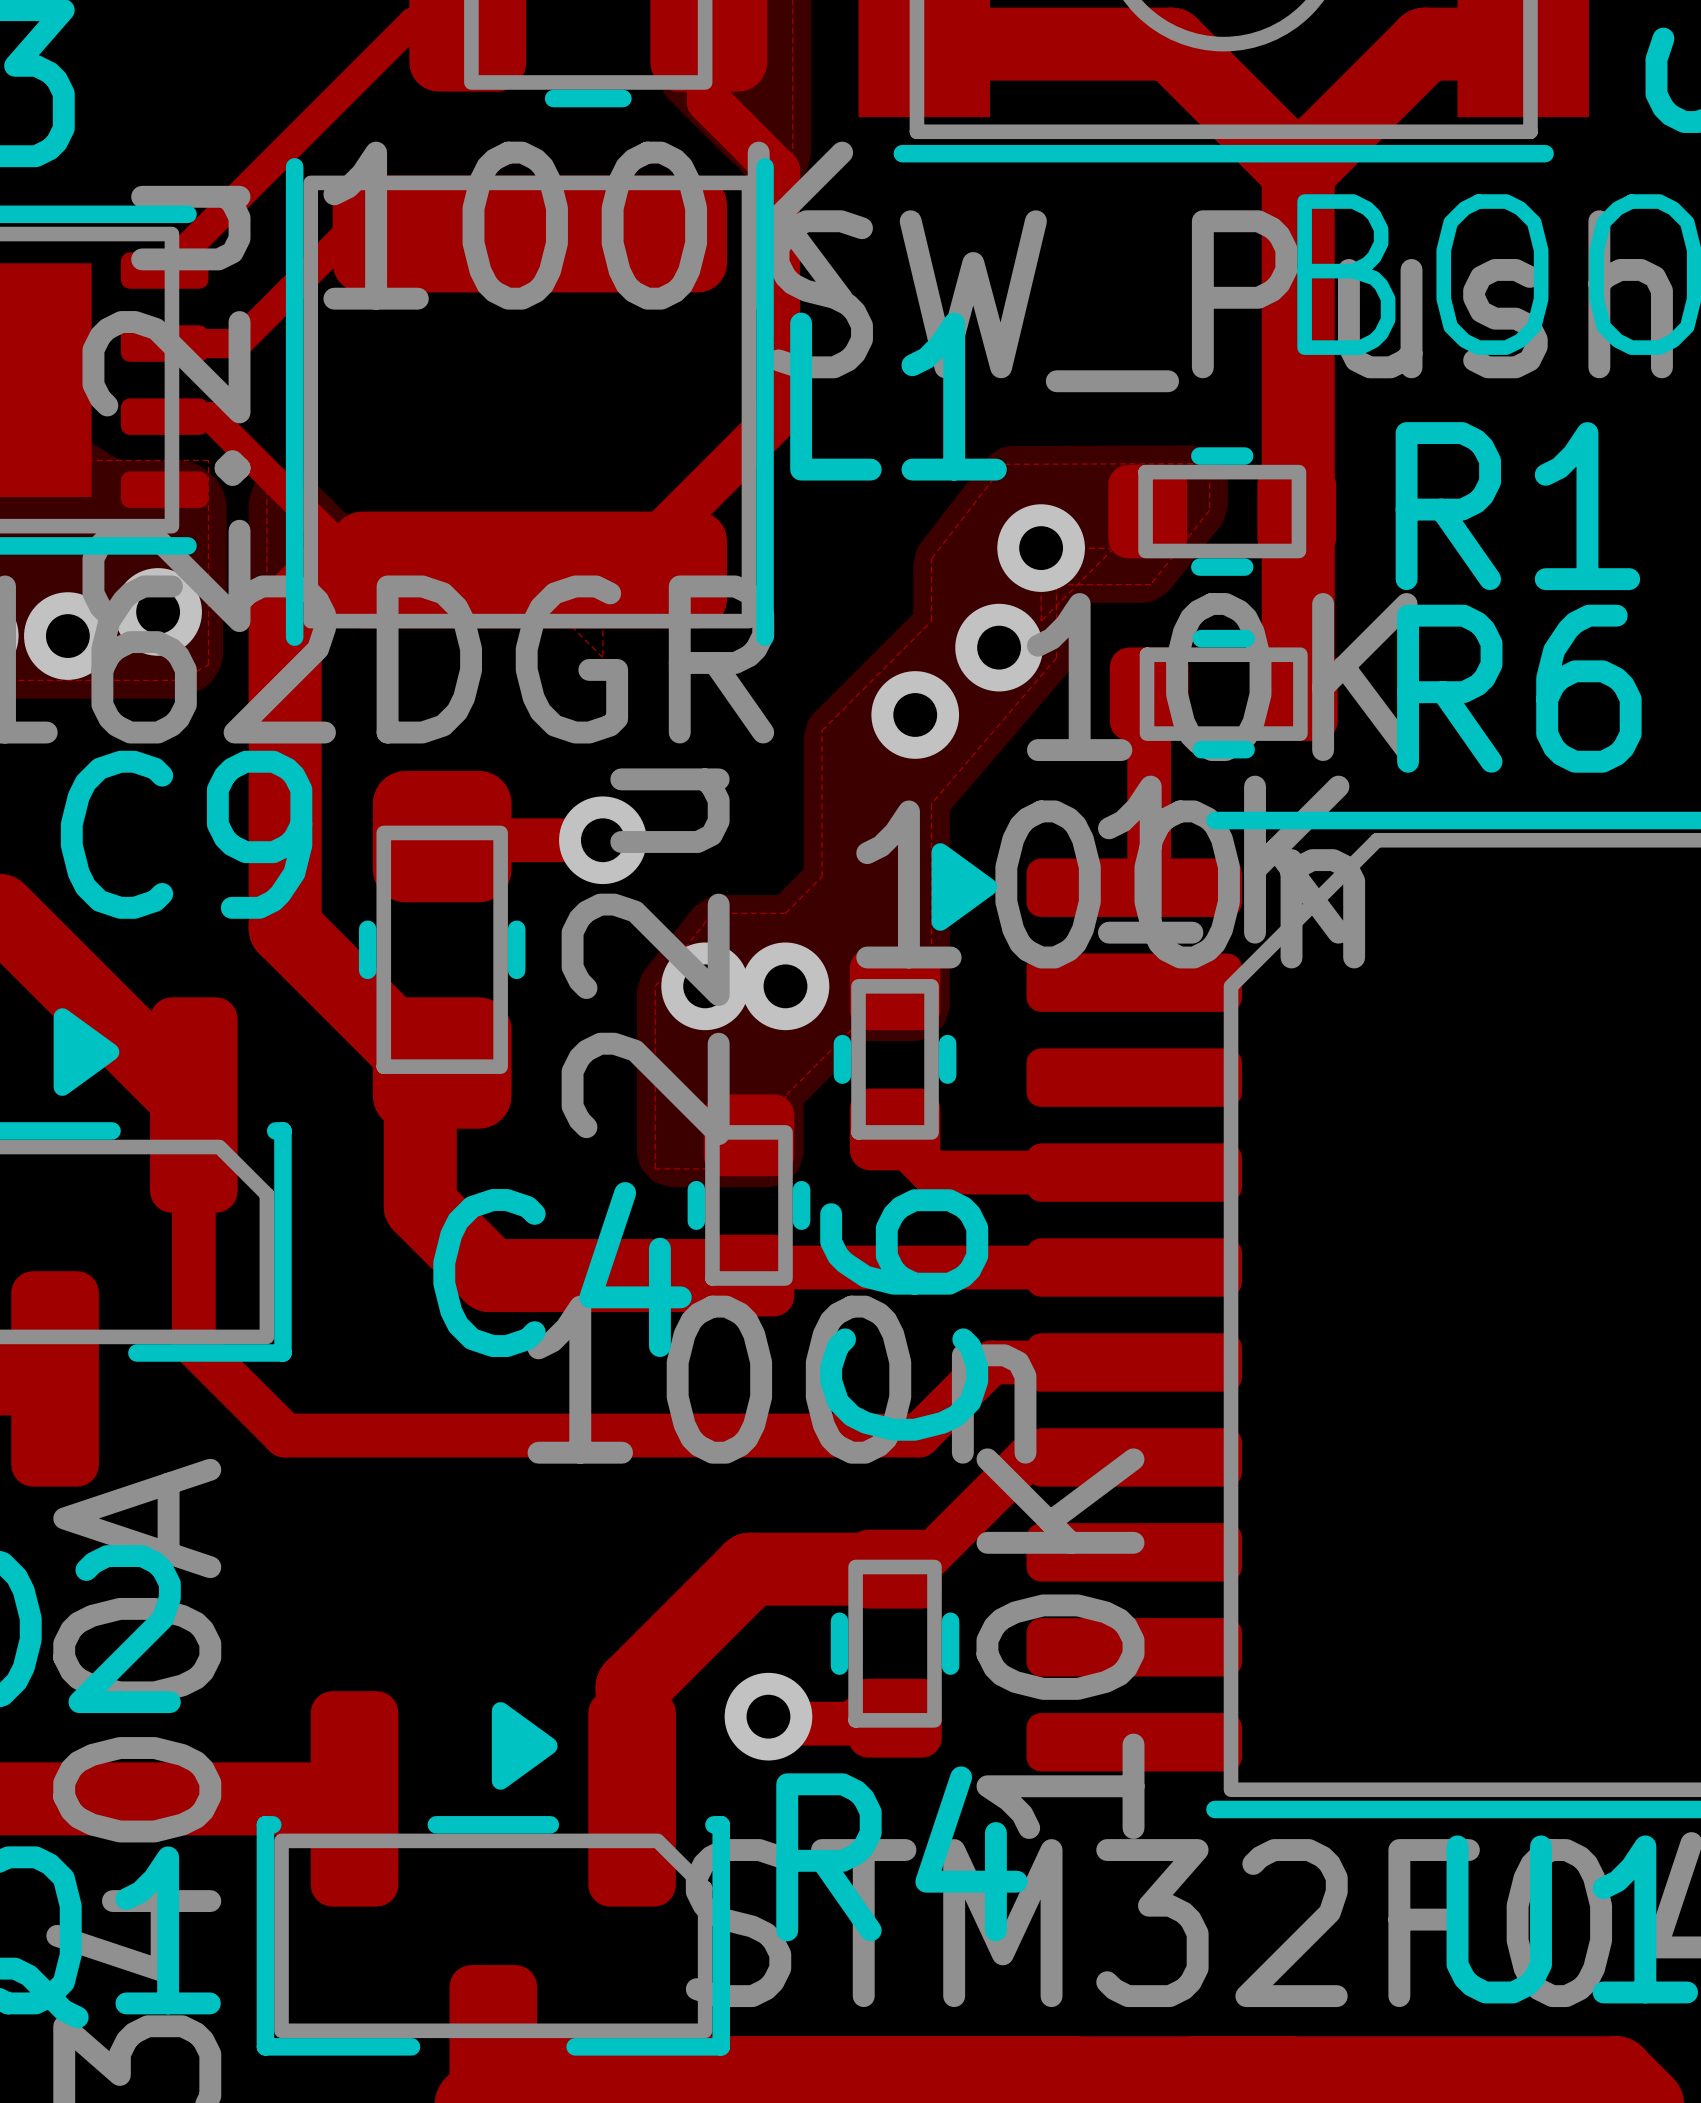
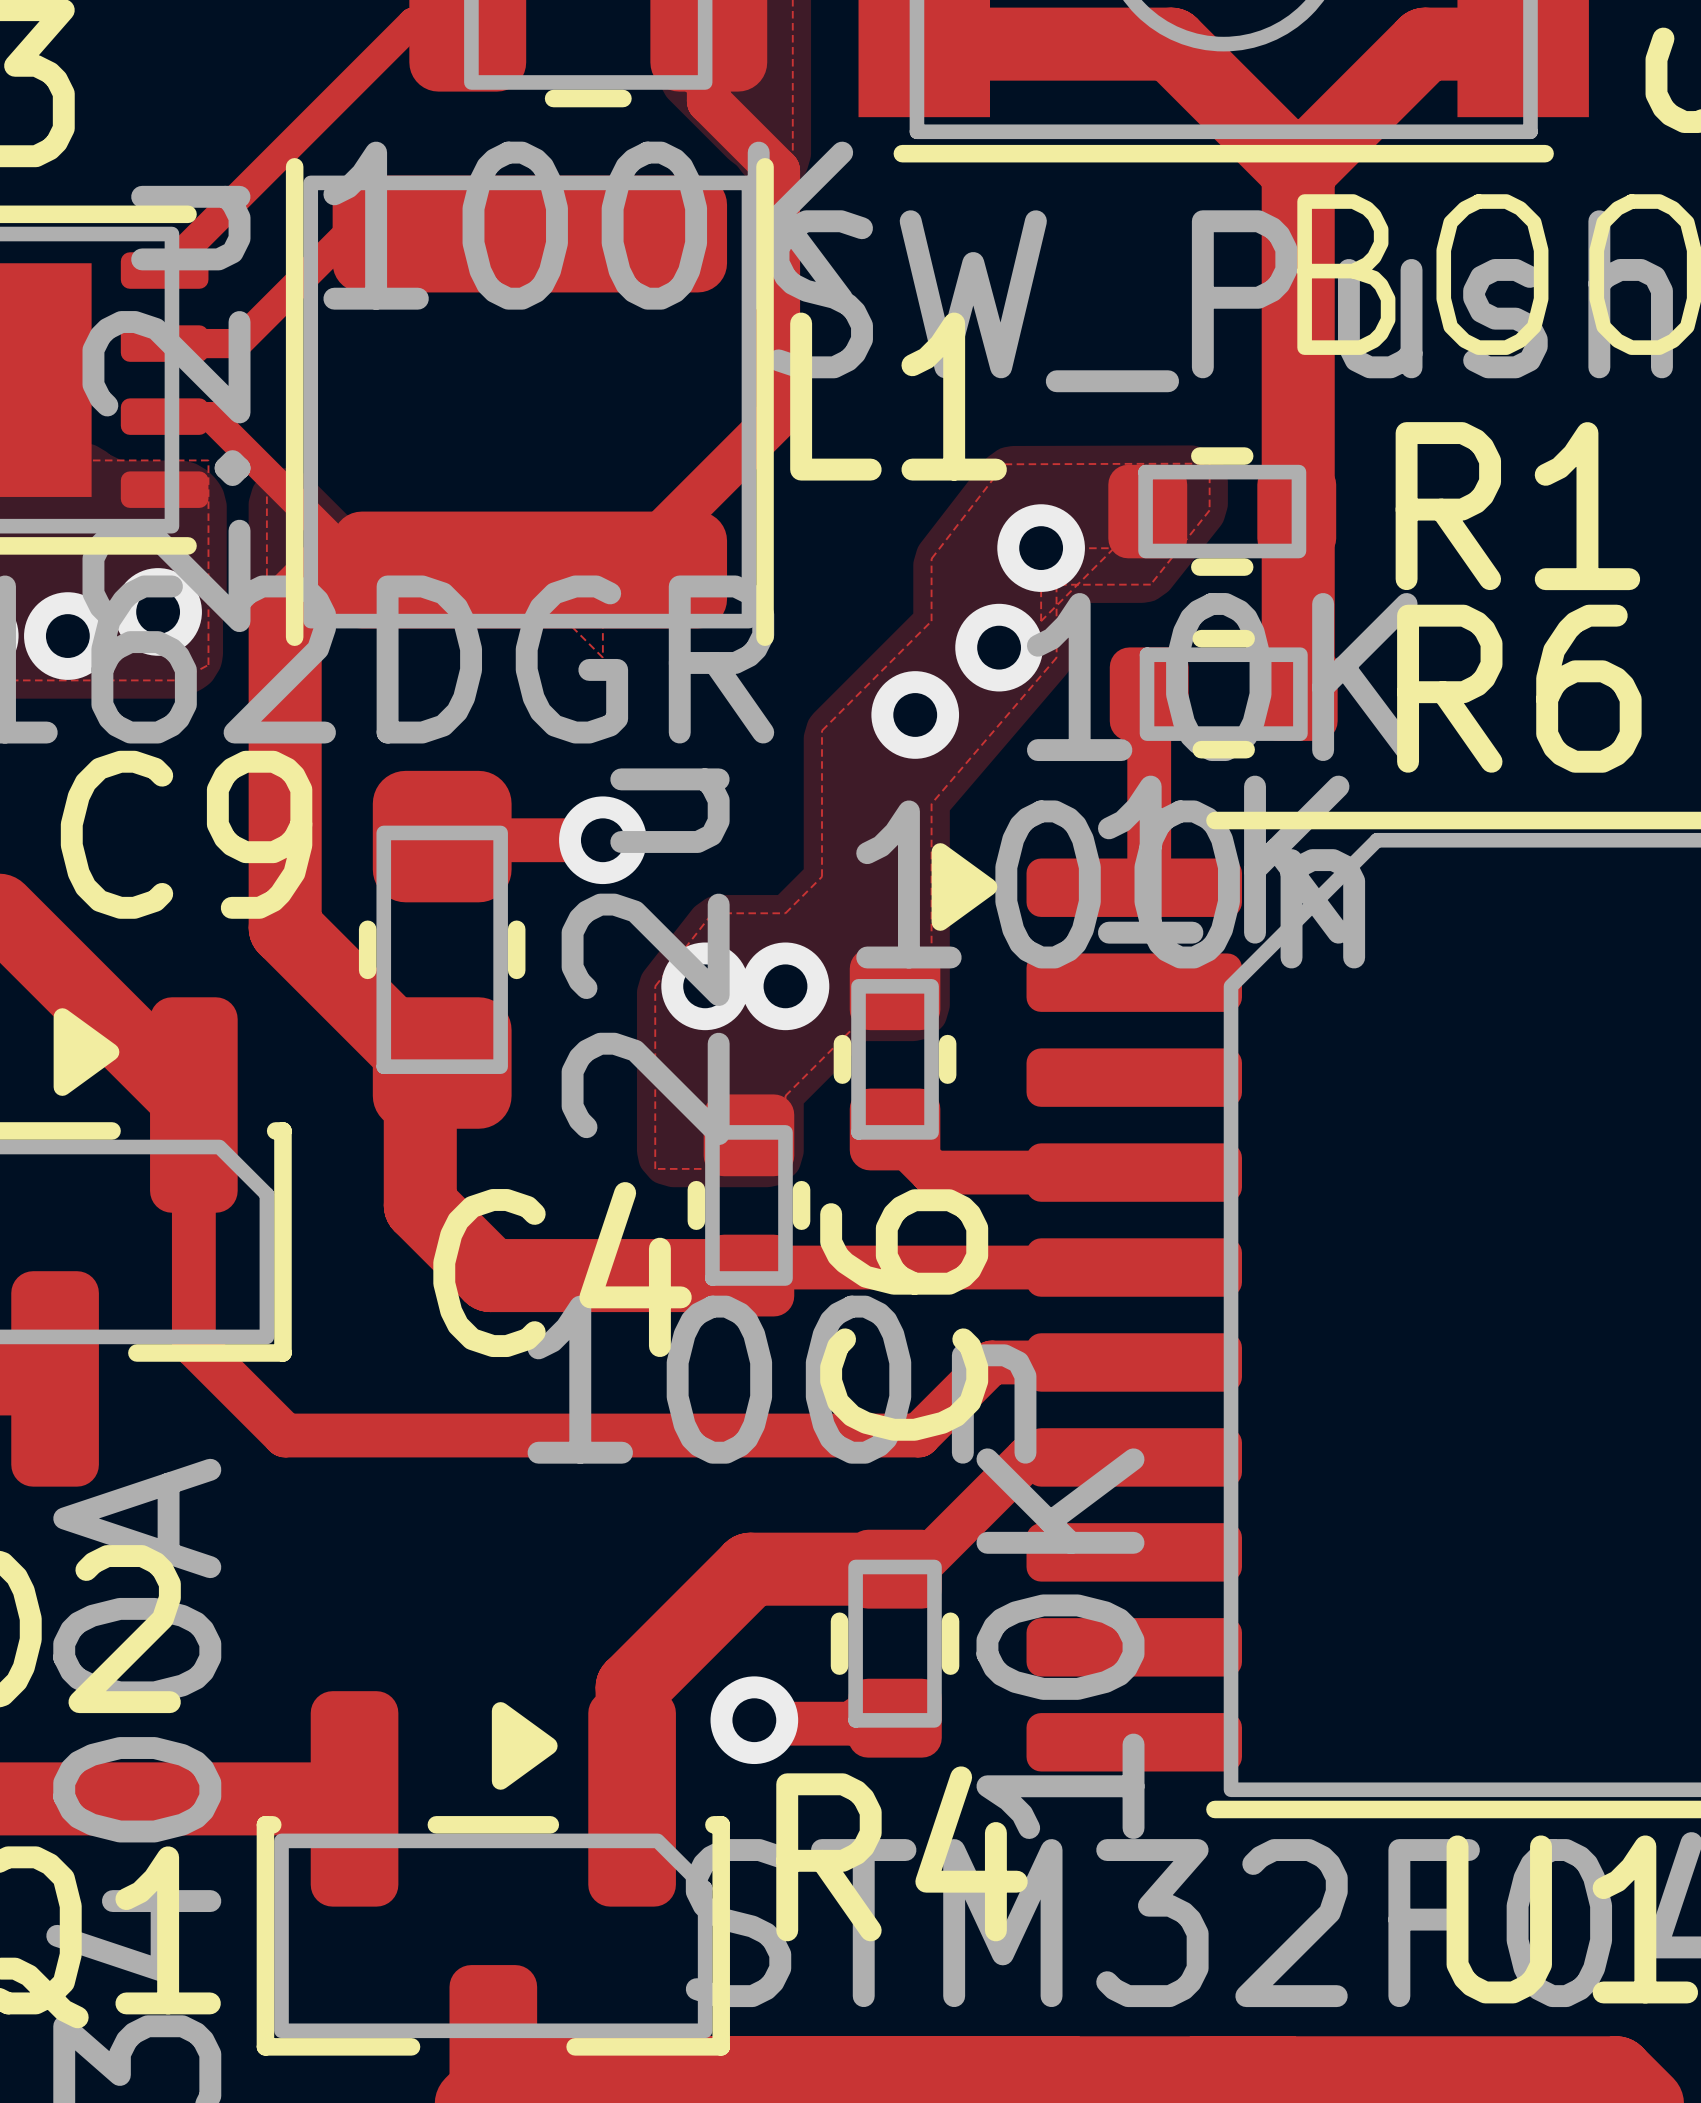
via position: (768, 1716) -> (754, 1720)

